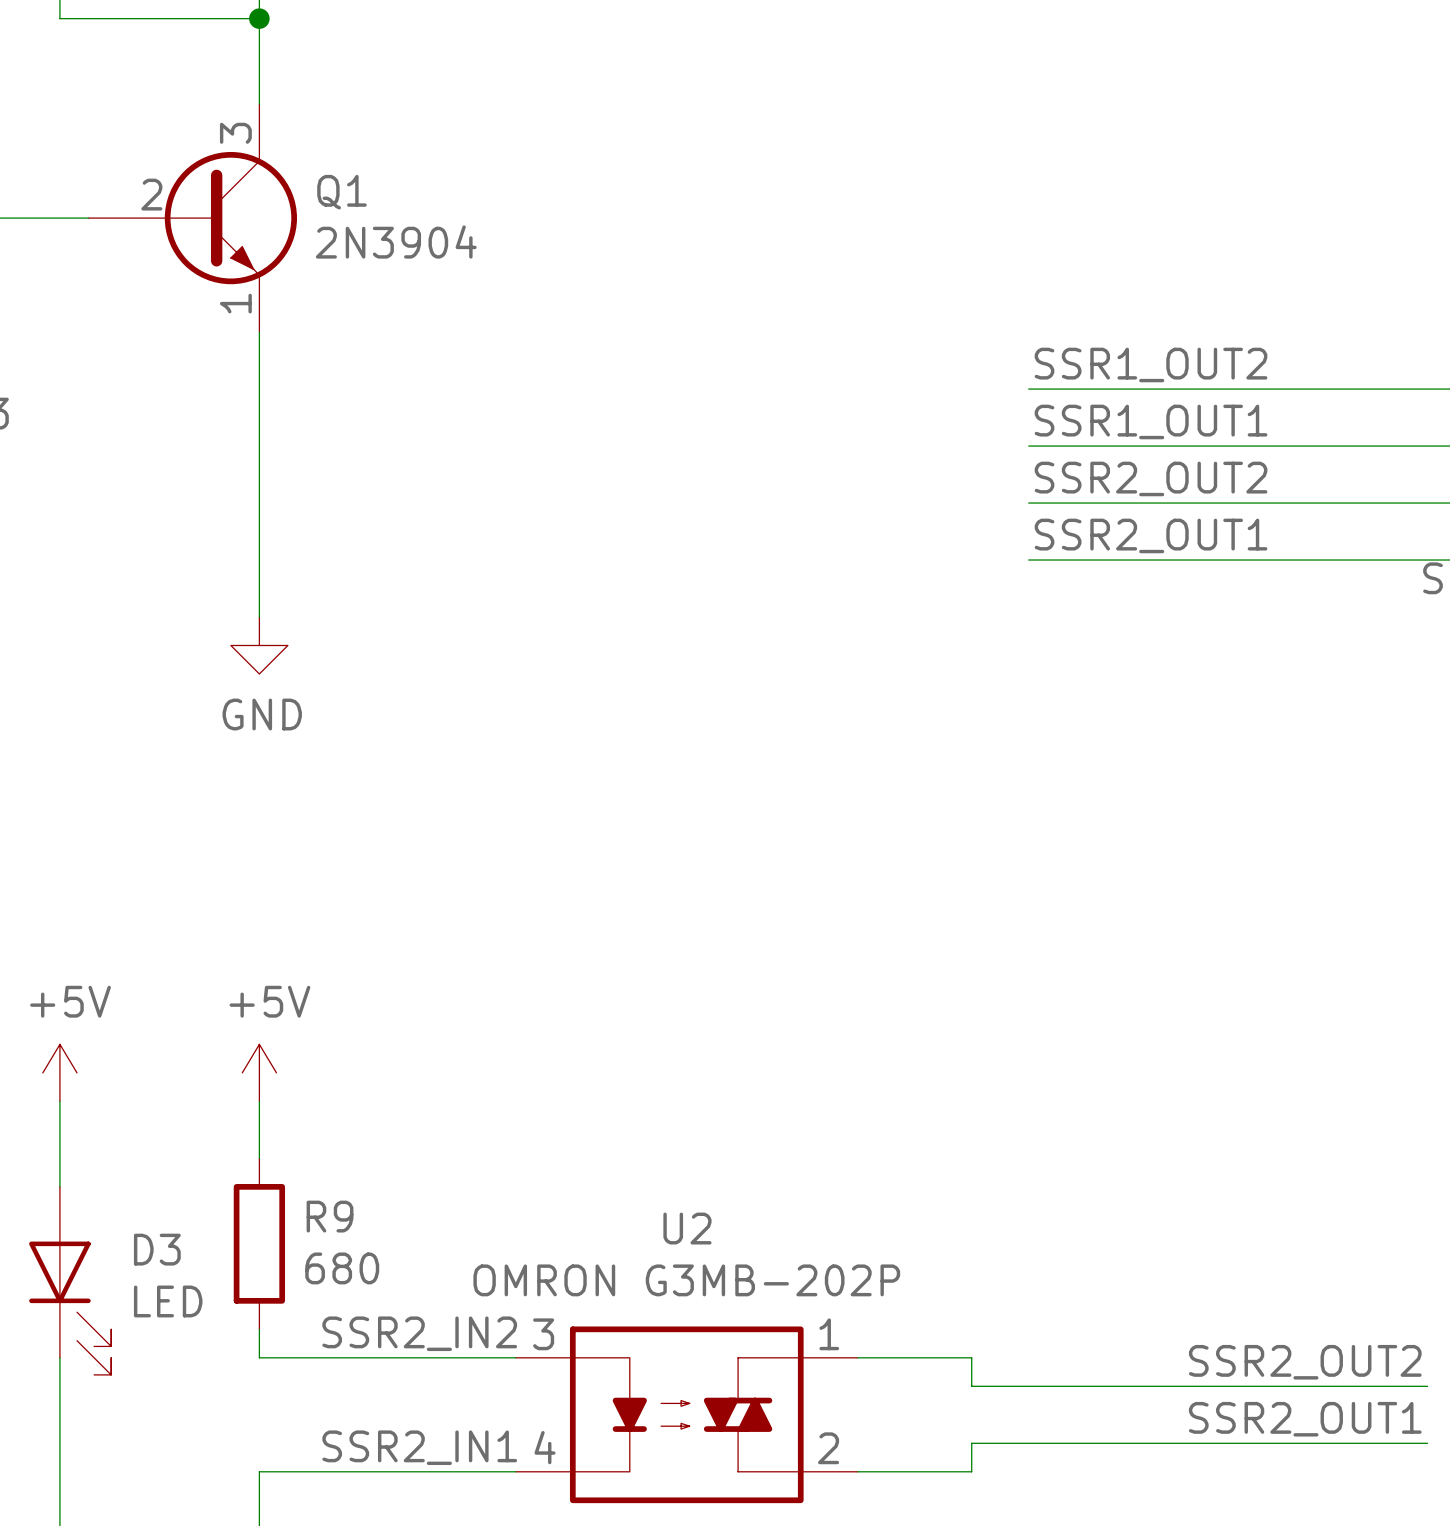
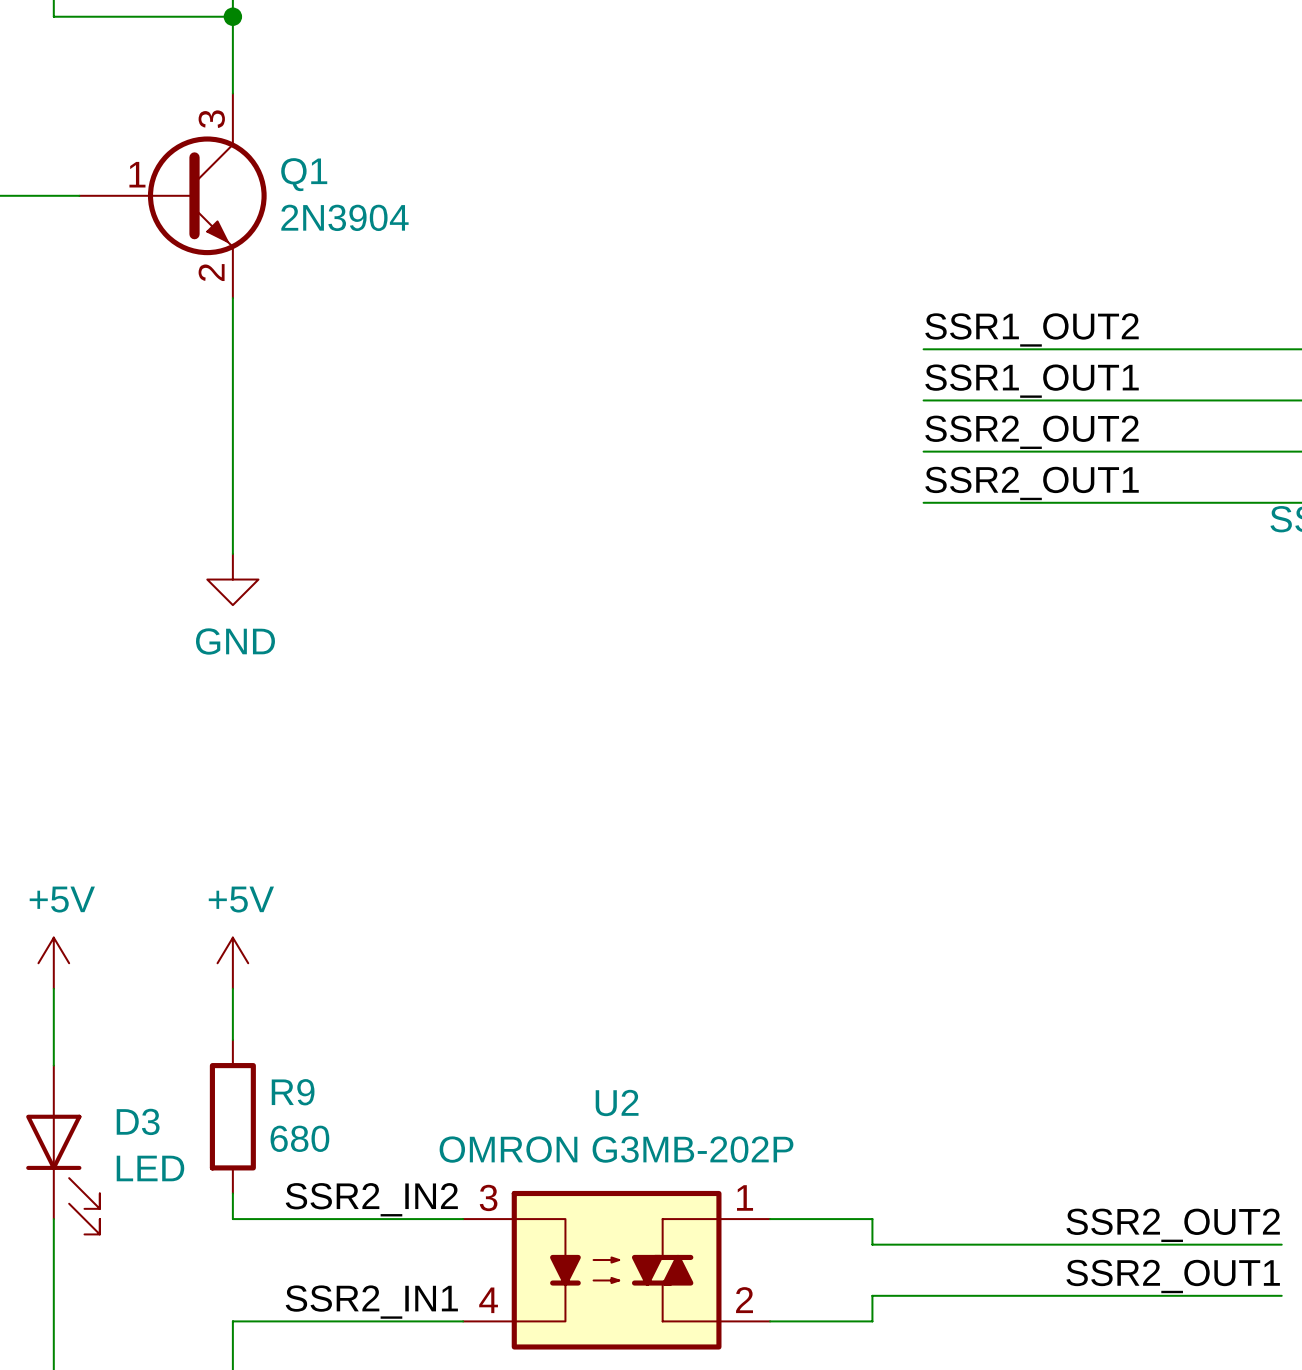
Q1 pin number: 2 (151, 194) -> 1 (137, 174)
Q1 pin number: 1 (235, 303) -> 2 (211, 272)

